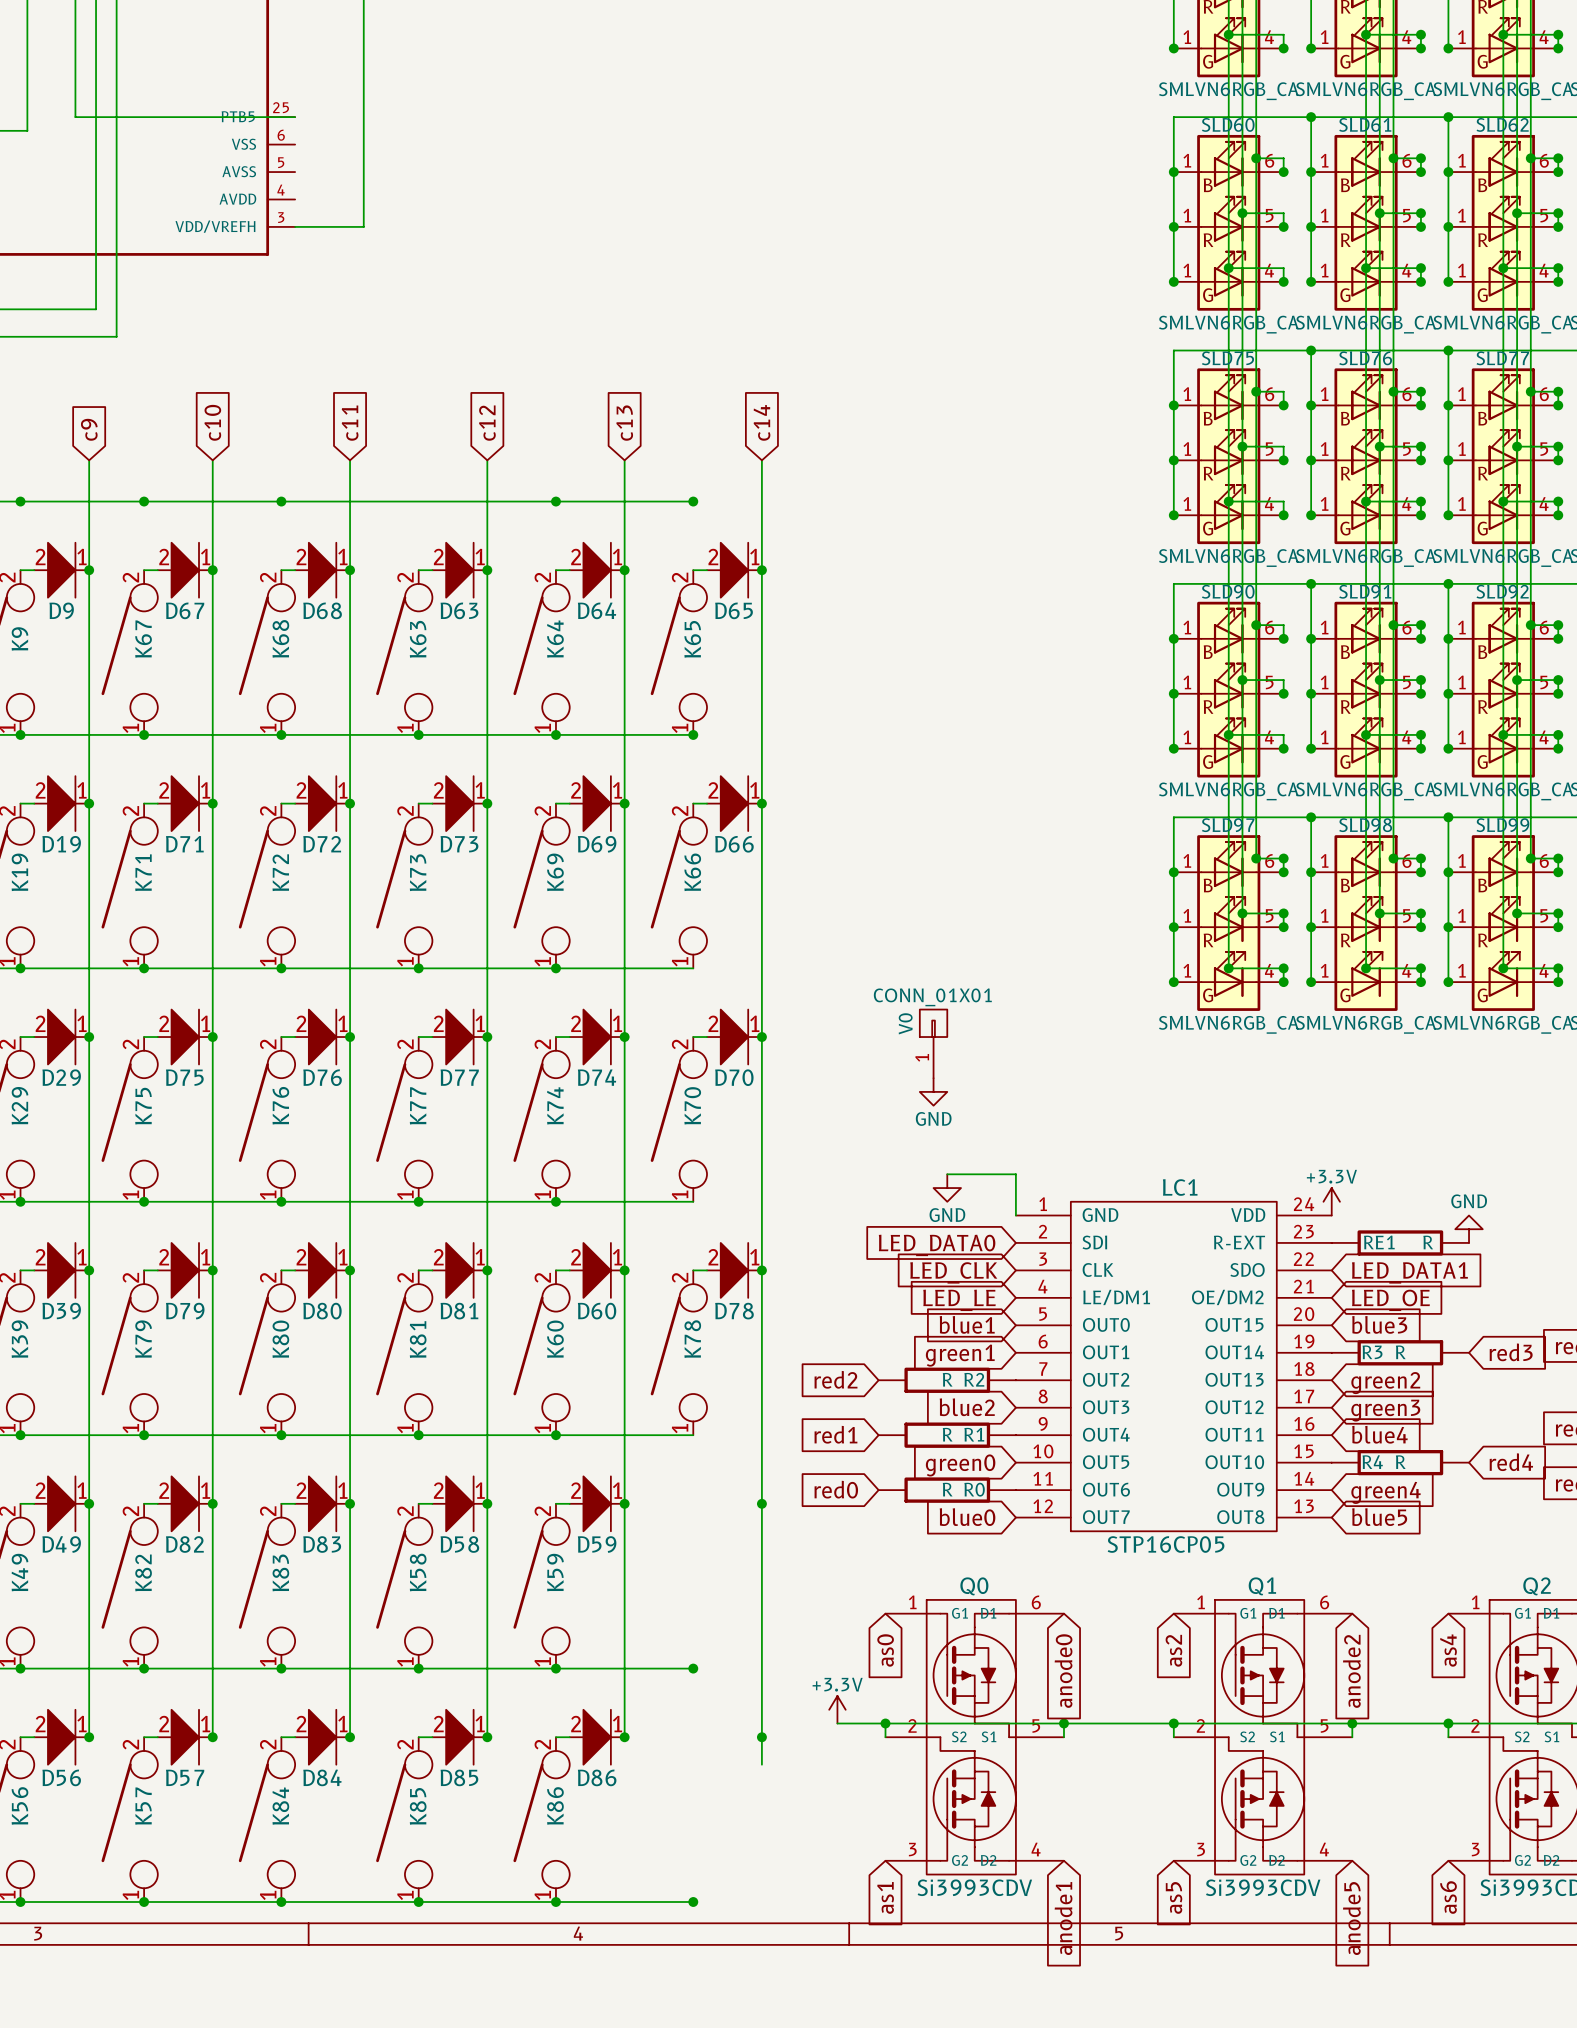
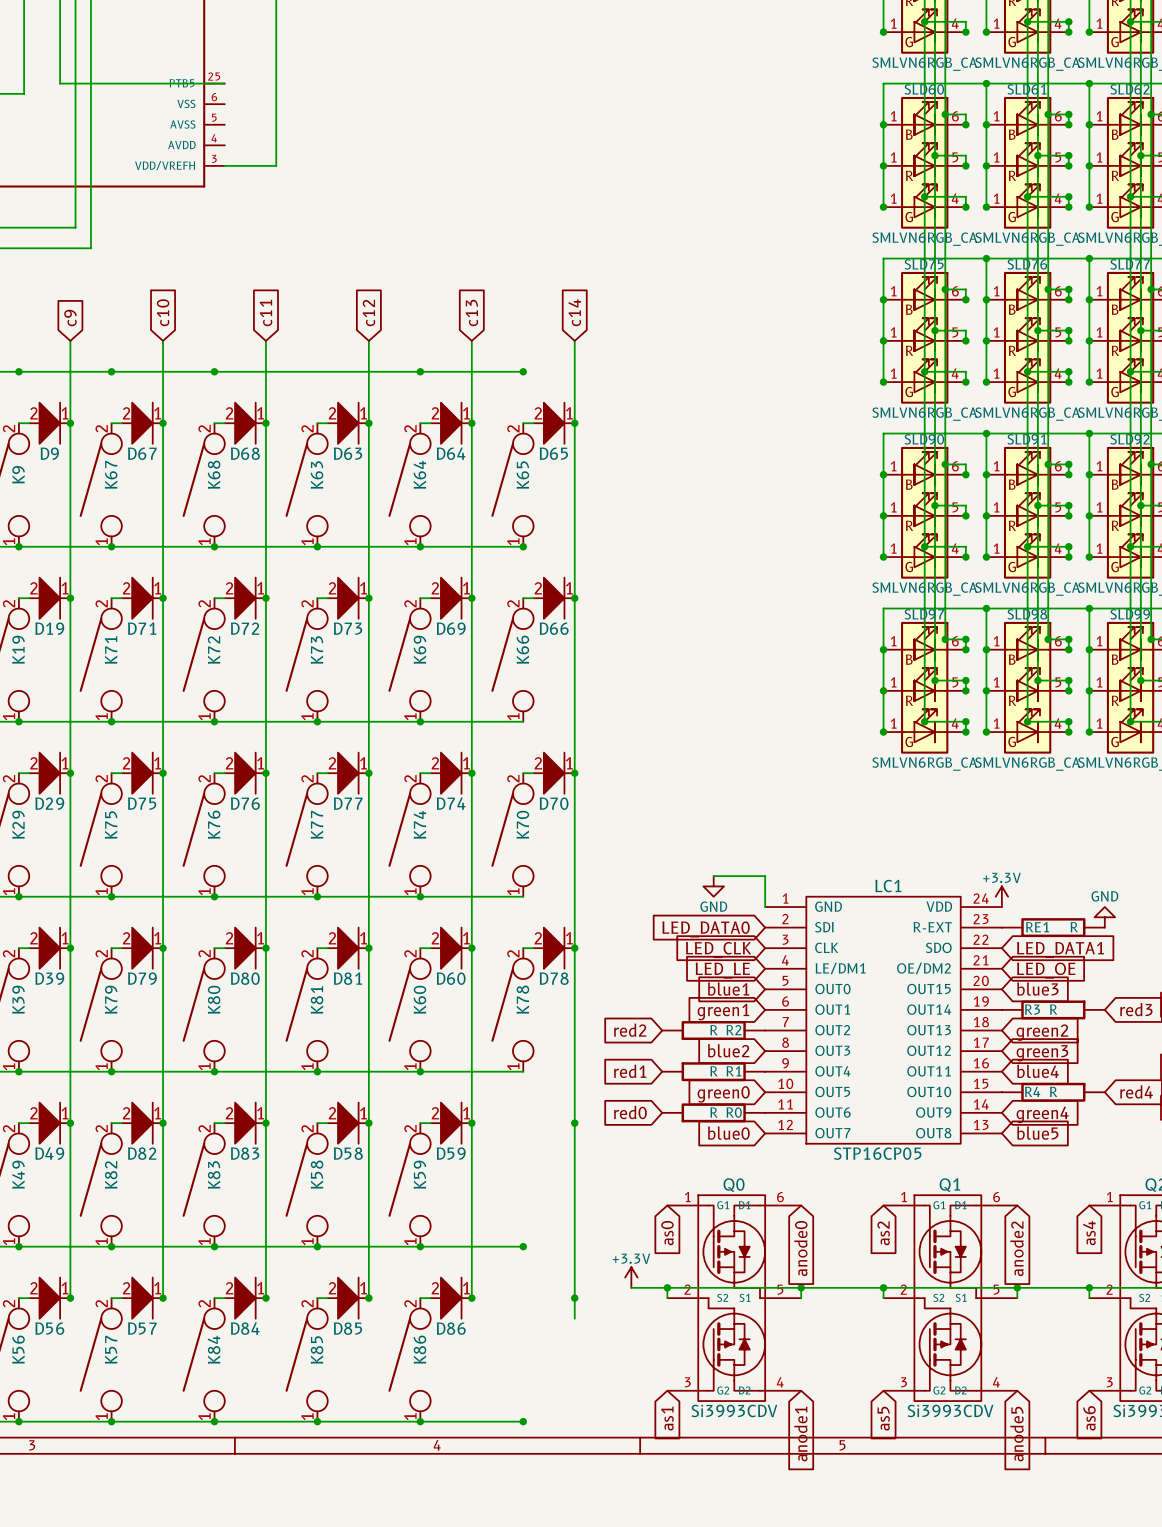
V0: CONN_01X01 (933, 1043) -> none
power symbol: GND (933, 1091) -> none

